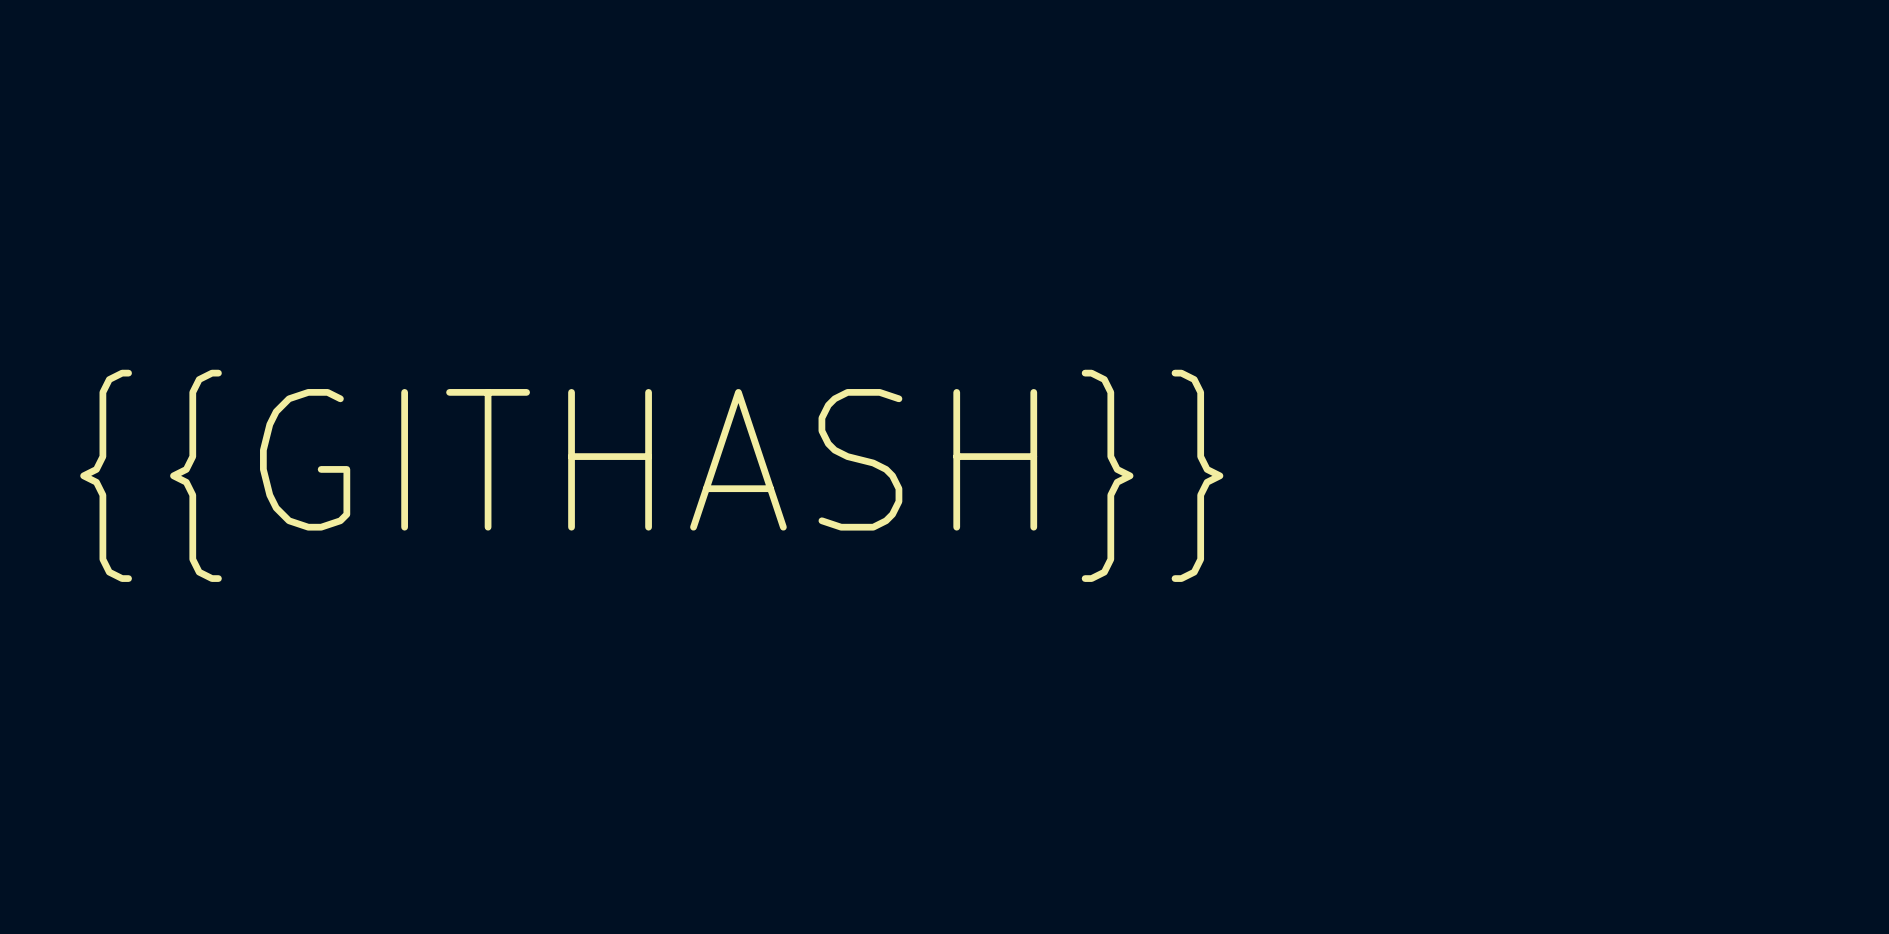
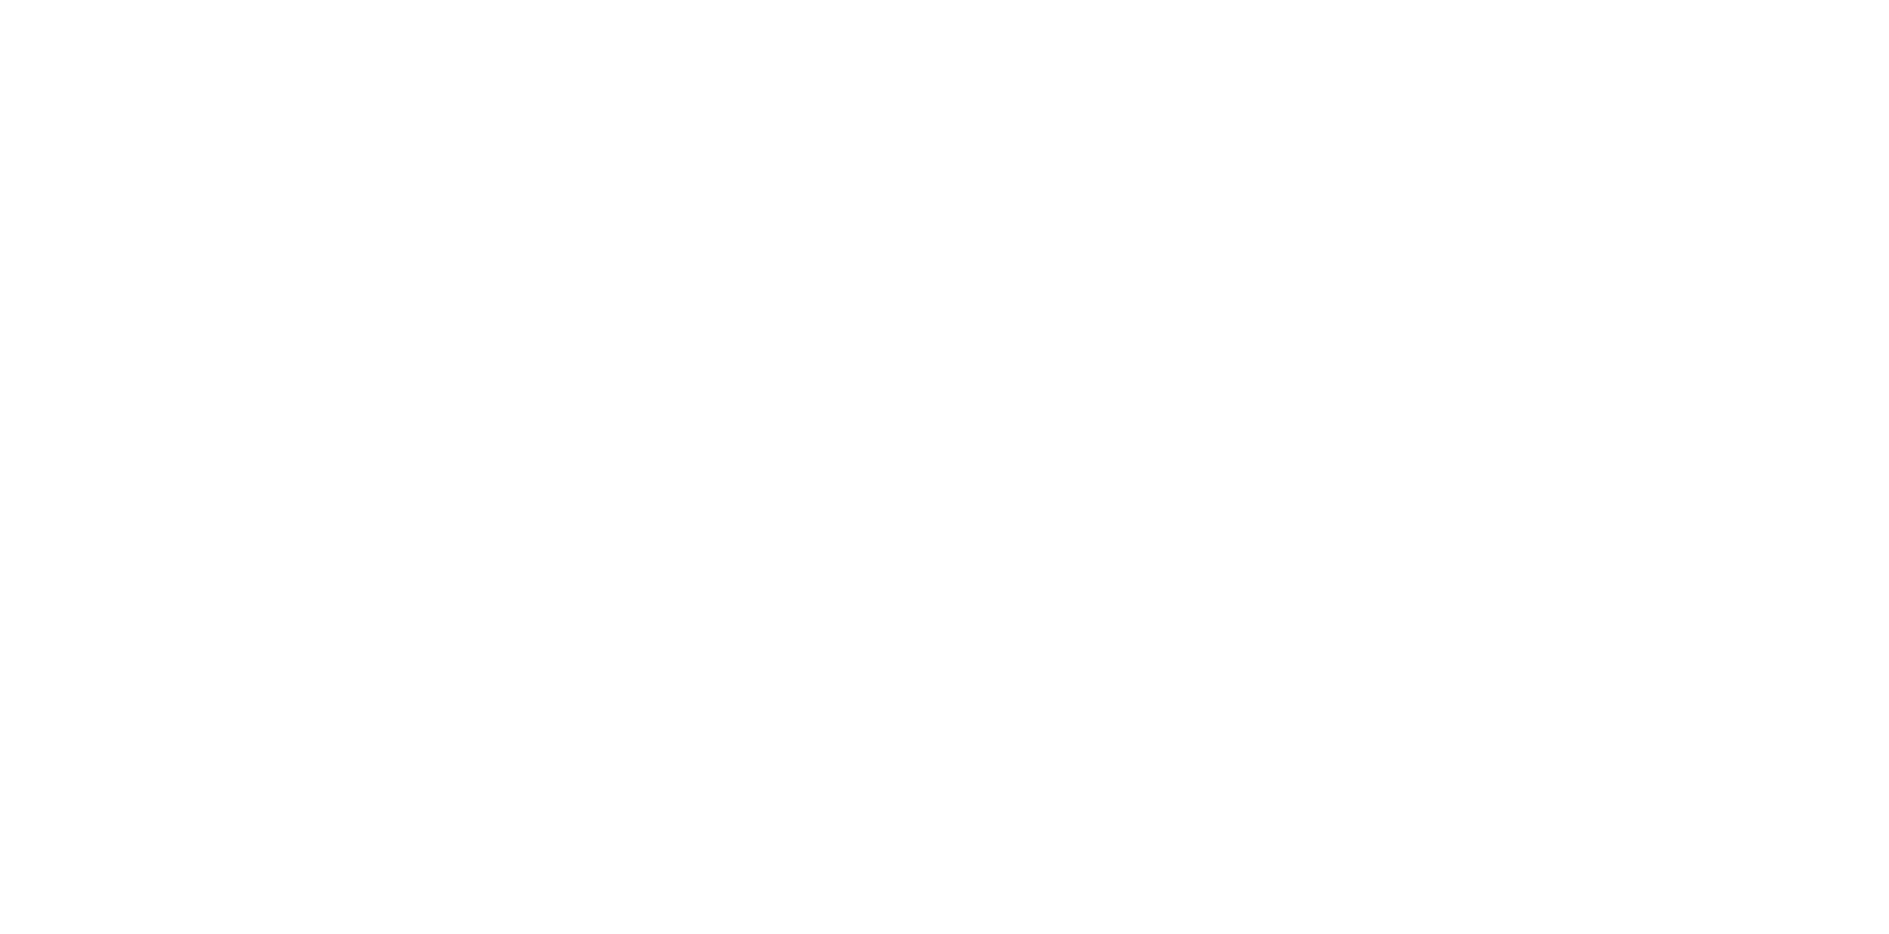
text: {{GITHASH}} (651, 475) -> none

